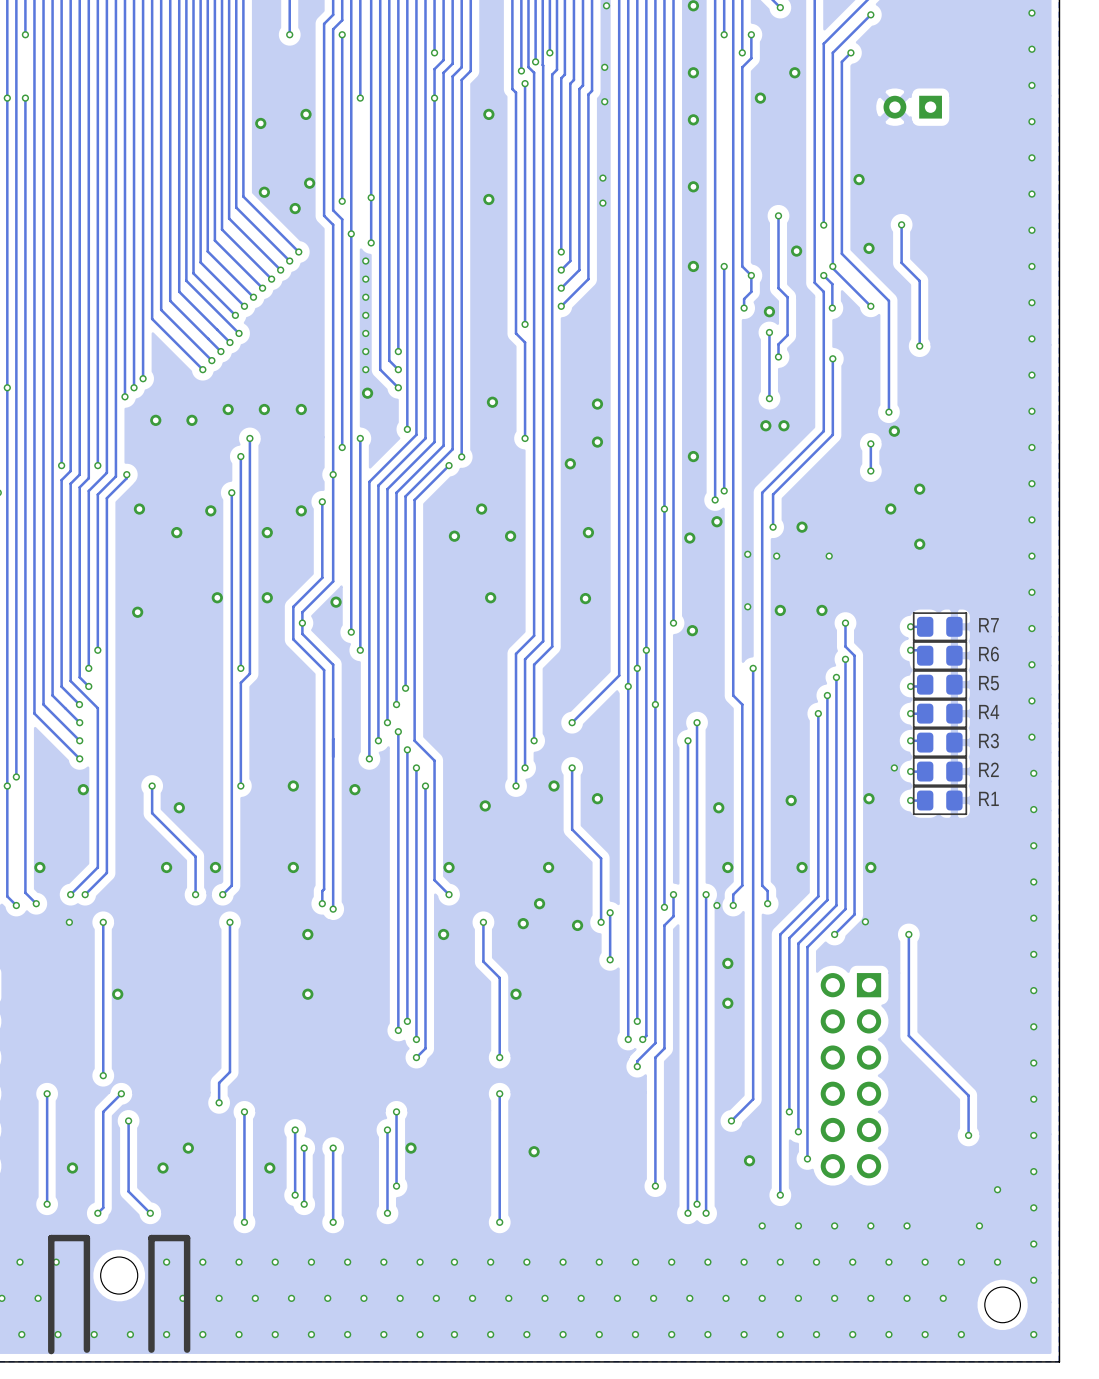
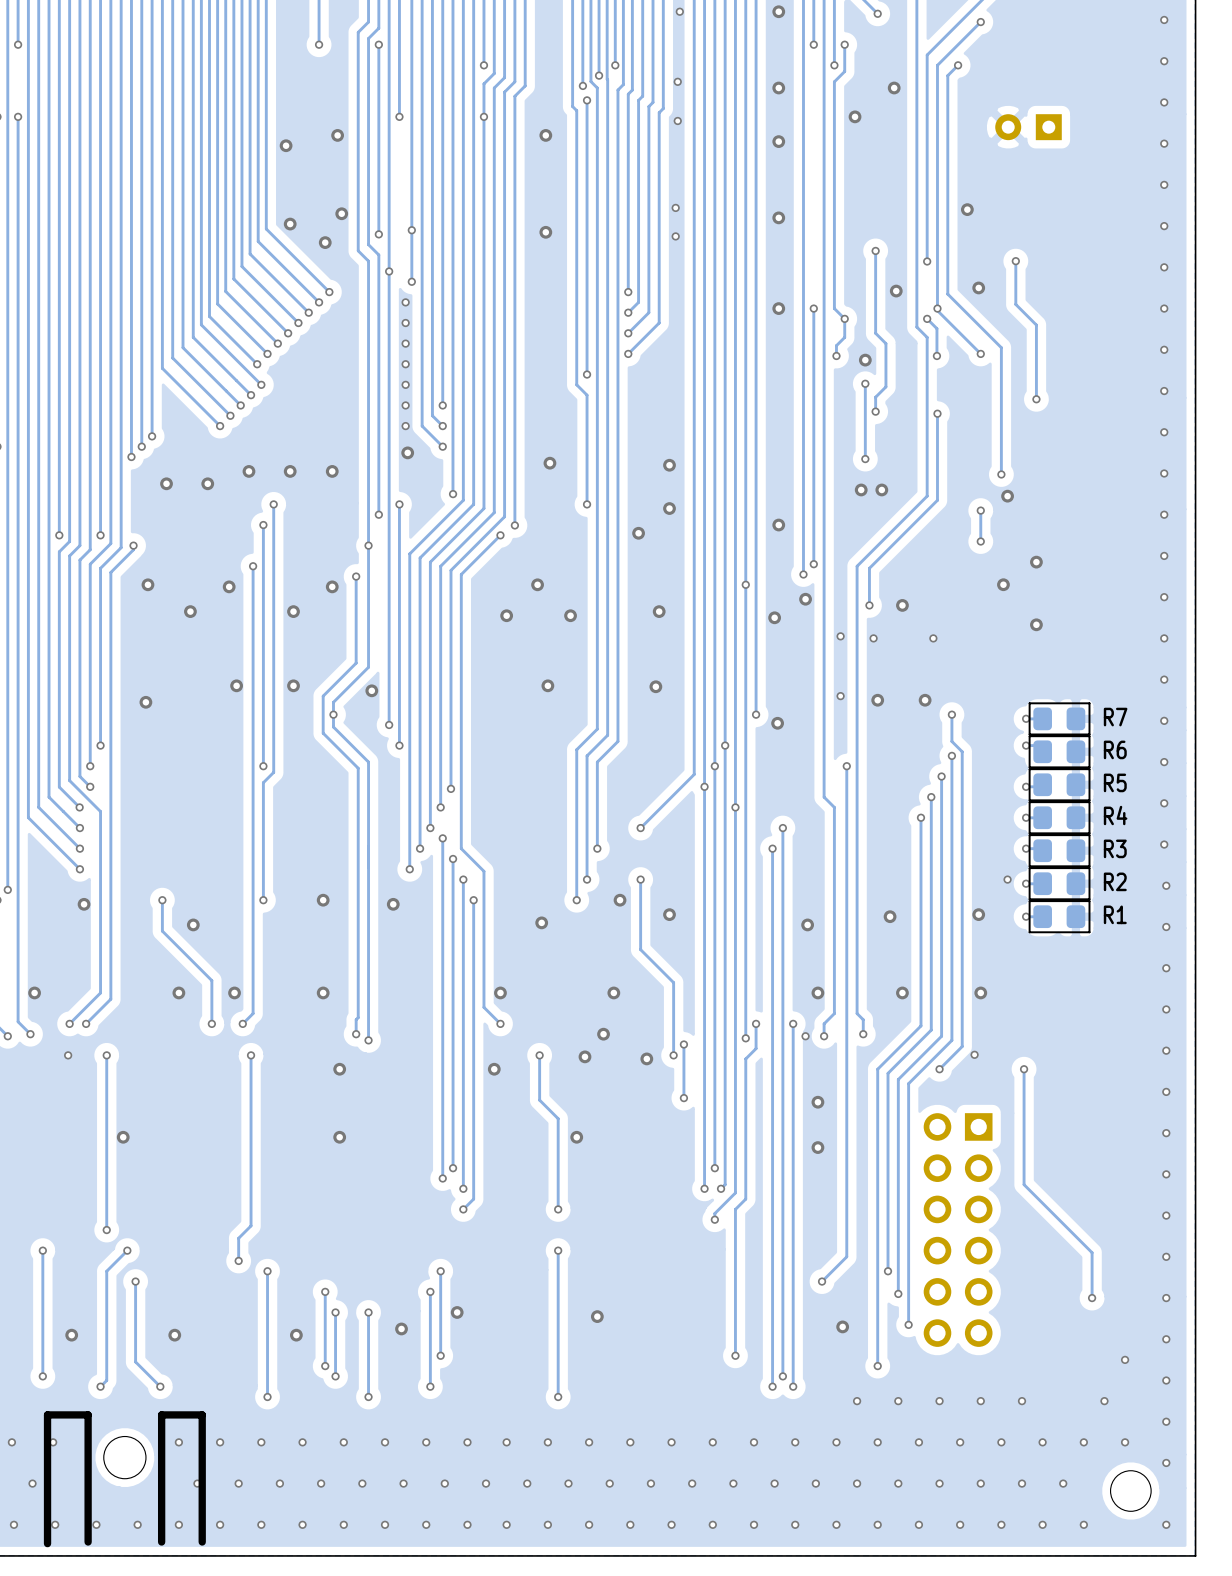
via: (188, 1148) -> none
via: none -> (401, 1328)

